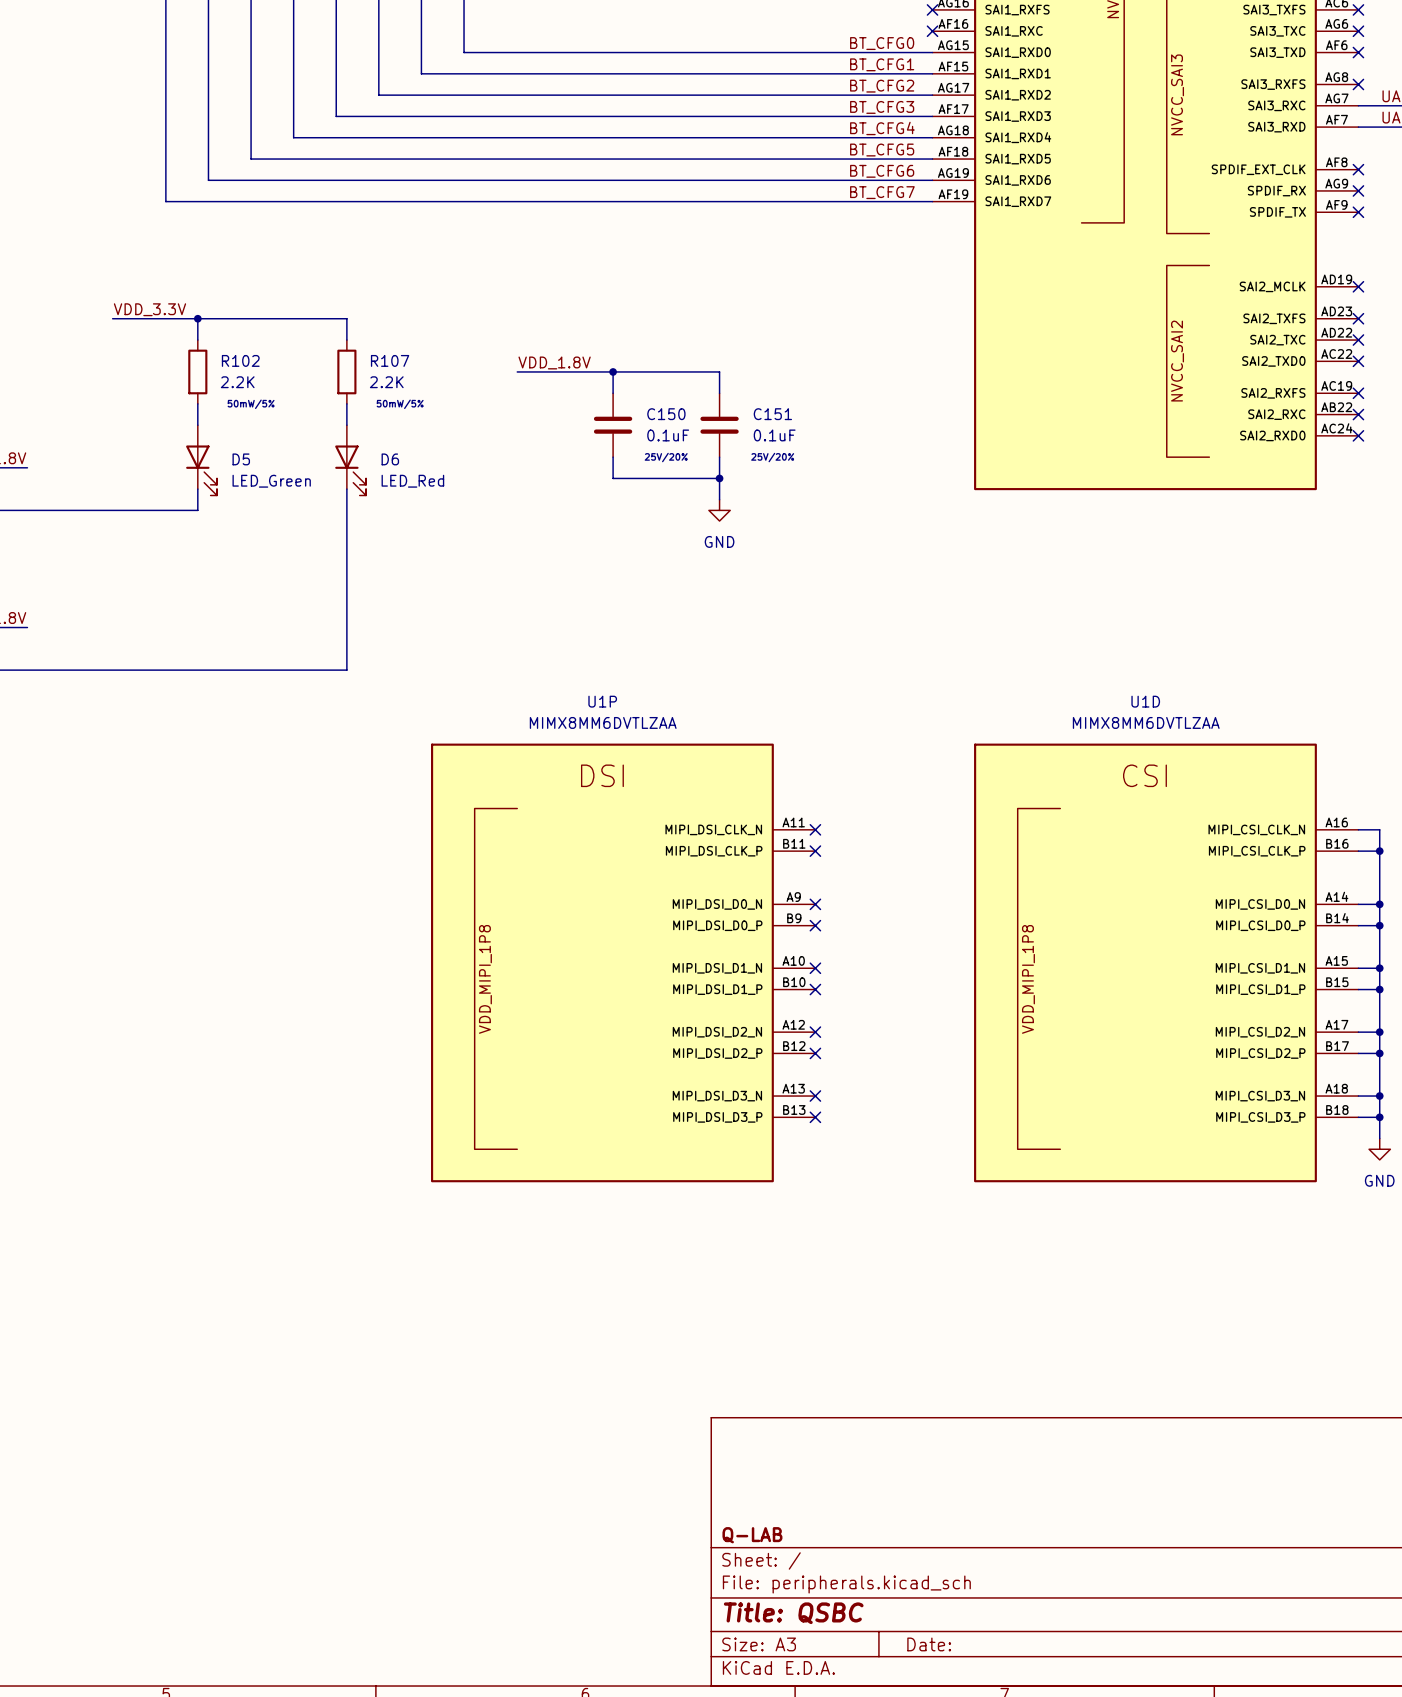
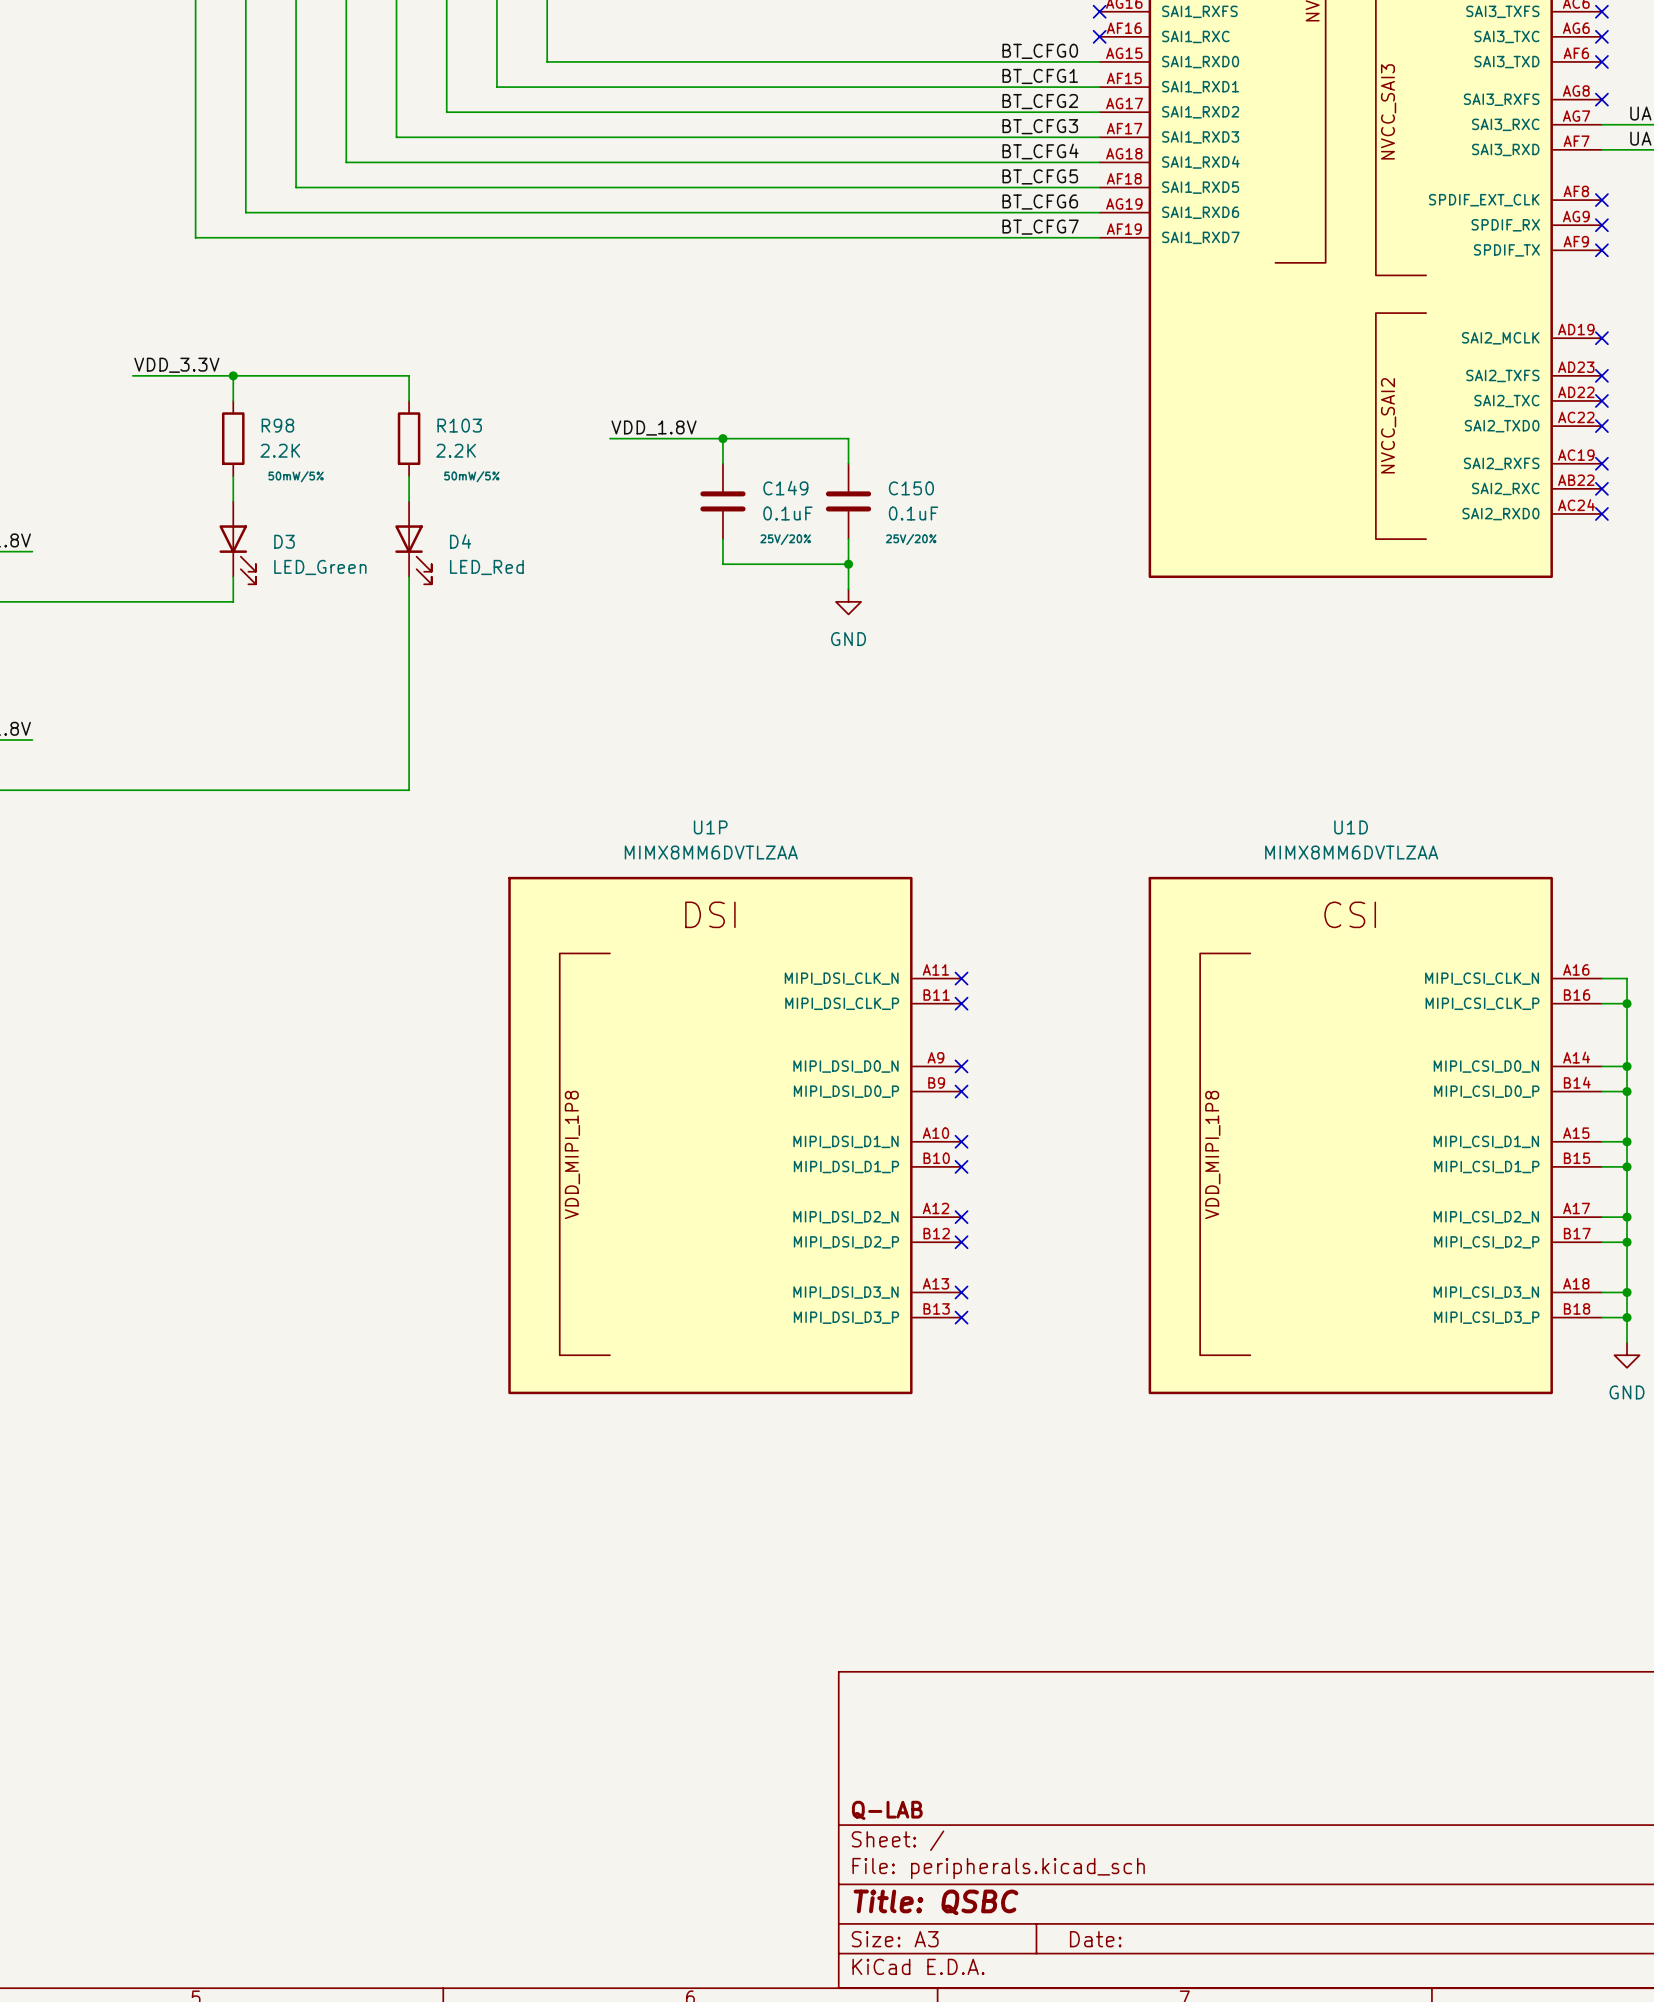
R102 name: R102 (240, 360) -> R98 (277, 425)
R107 name: R107 (390, 360) -> R103 (459, 425)
C150 name: C150 (666, 414) -> C149 (785, 488)
C151 name: C151 (772, 414) -> C150 (911, 488)
D5 name: D5 (241, 459) -> D3 (284, 541)
D6 name: D6 (390, 459) -> D4 (460, 541)

